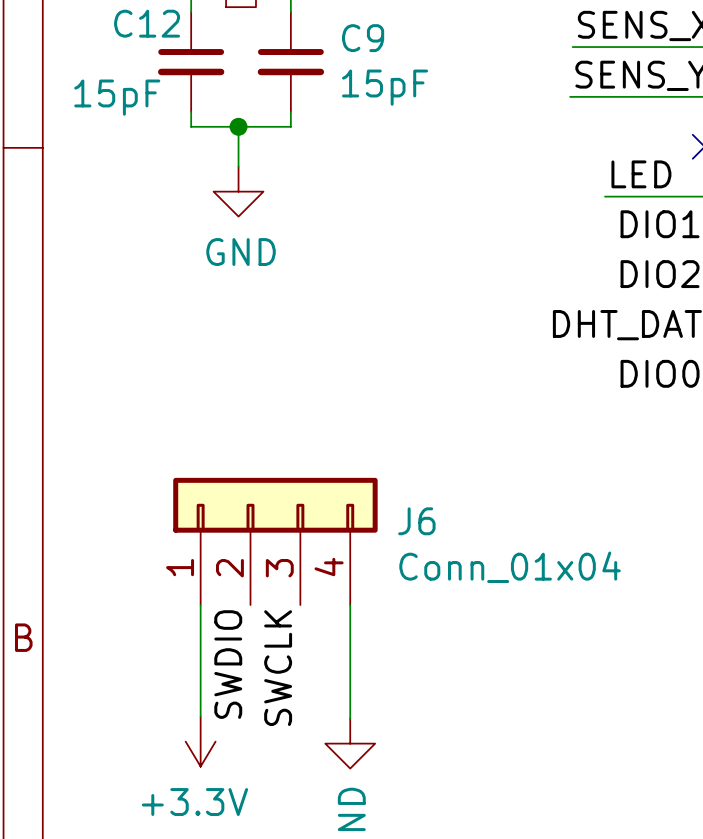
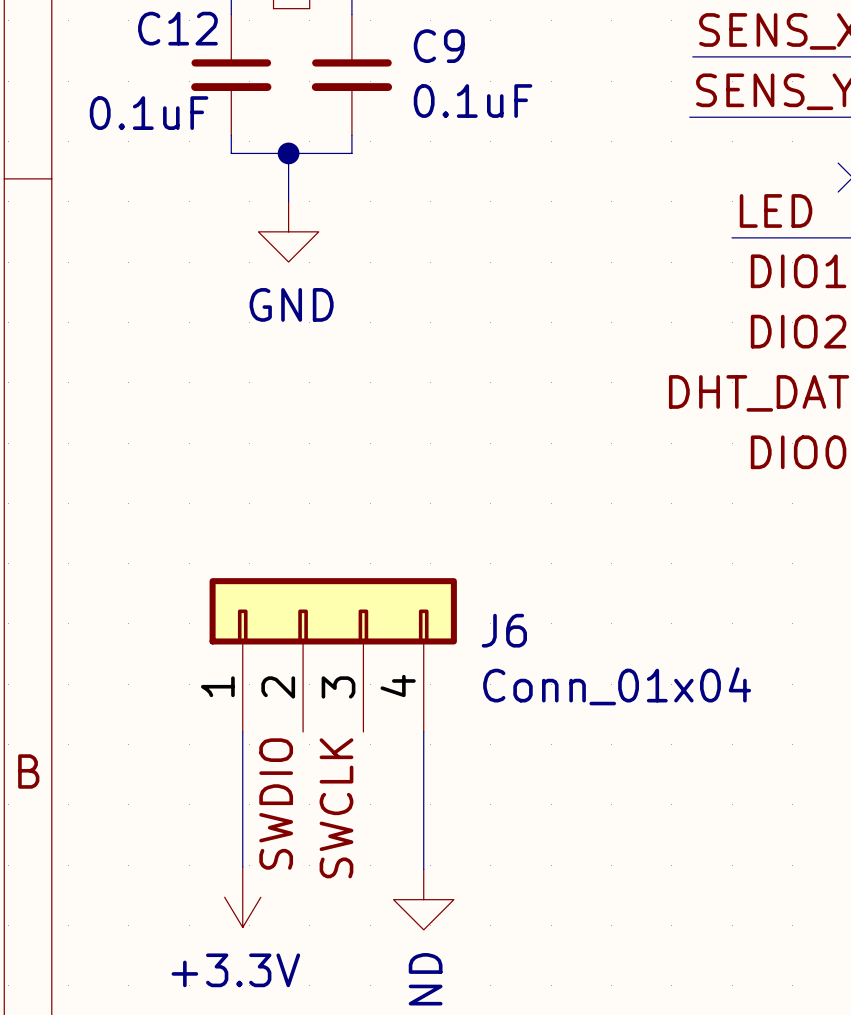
C9 value: 15pF (385, 87) -> 0.1uF (473, 101)
C12 value: 15pF (117, 97) -> 0.1uF (149, 113)

